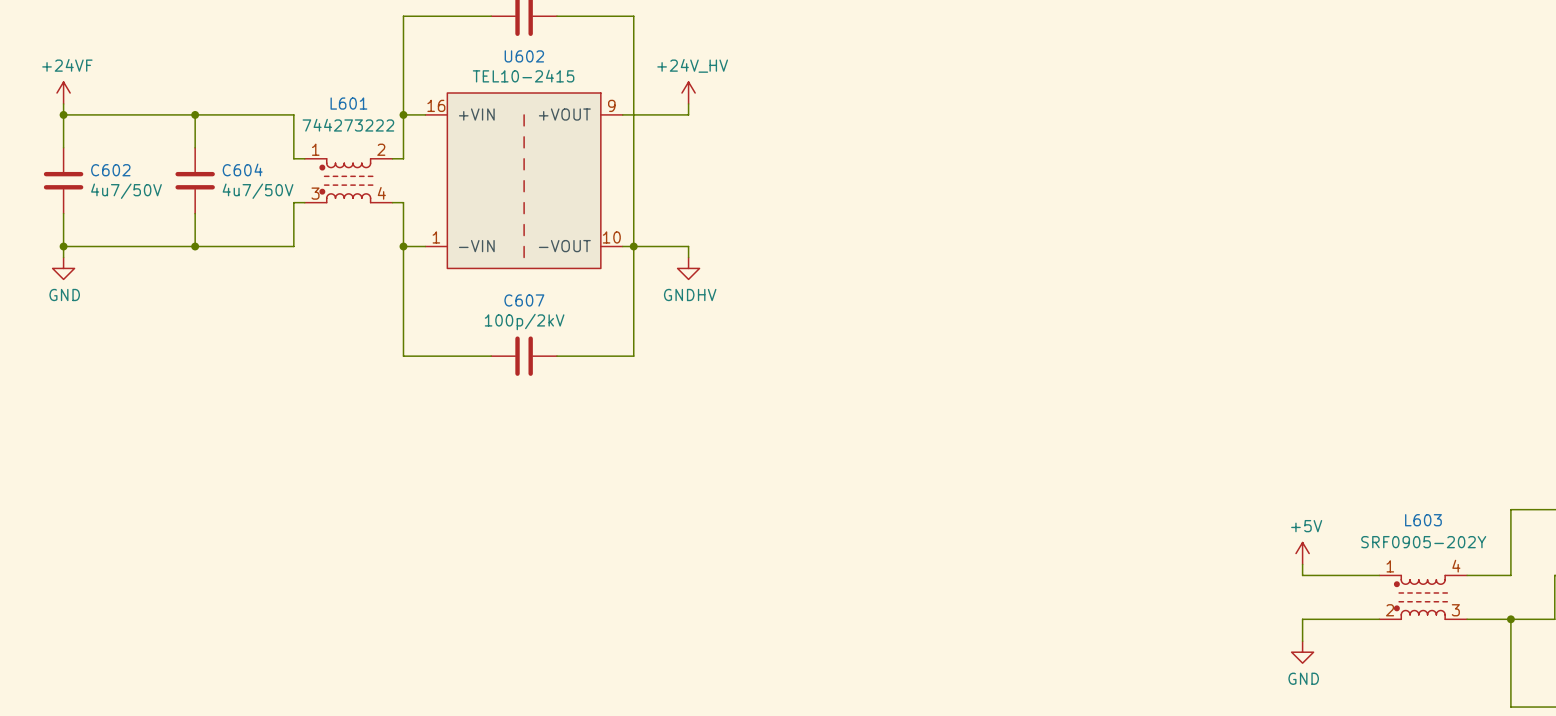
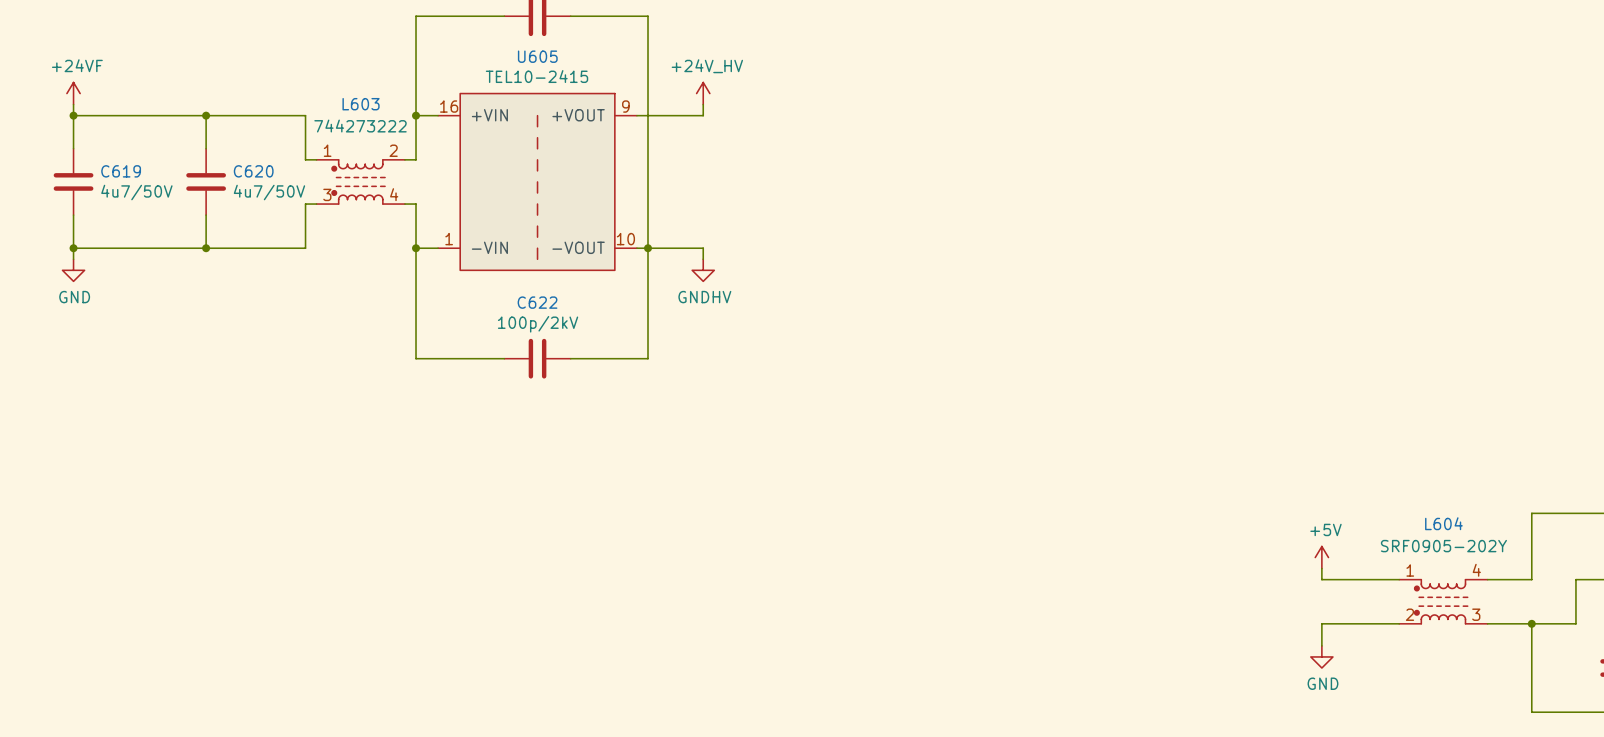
U602 name: U602 (524, 56) -> U605 (537, 56)
L601 name: L601 (348, 103) -> L603 (361, 104)
C604 name: C604 (242, 169) -> C620 (253, 171)
C602 name: C602 (110, 170) -> C619 (121, 171)
C607 name: C607 (524, 300) -> C622 (537, 302)
L603 name: L603 (1423, 520) -> L604 (1443, 523)

